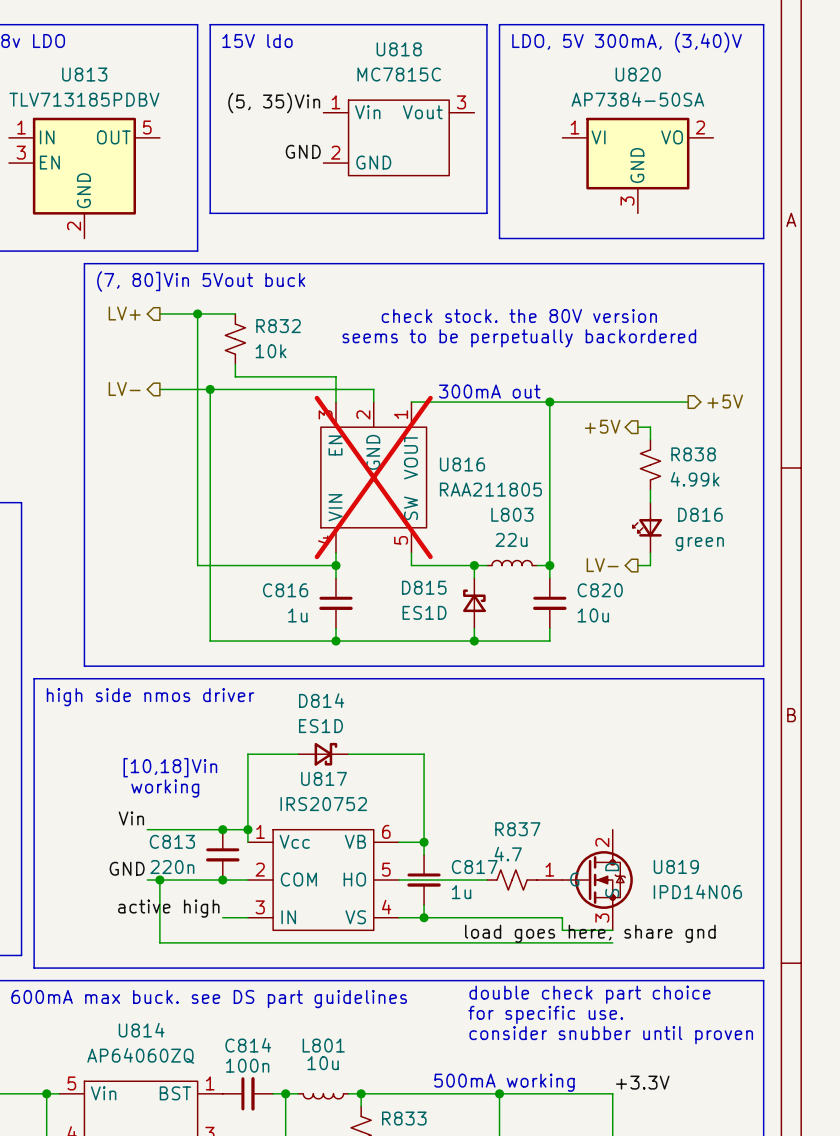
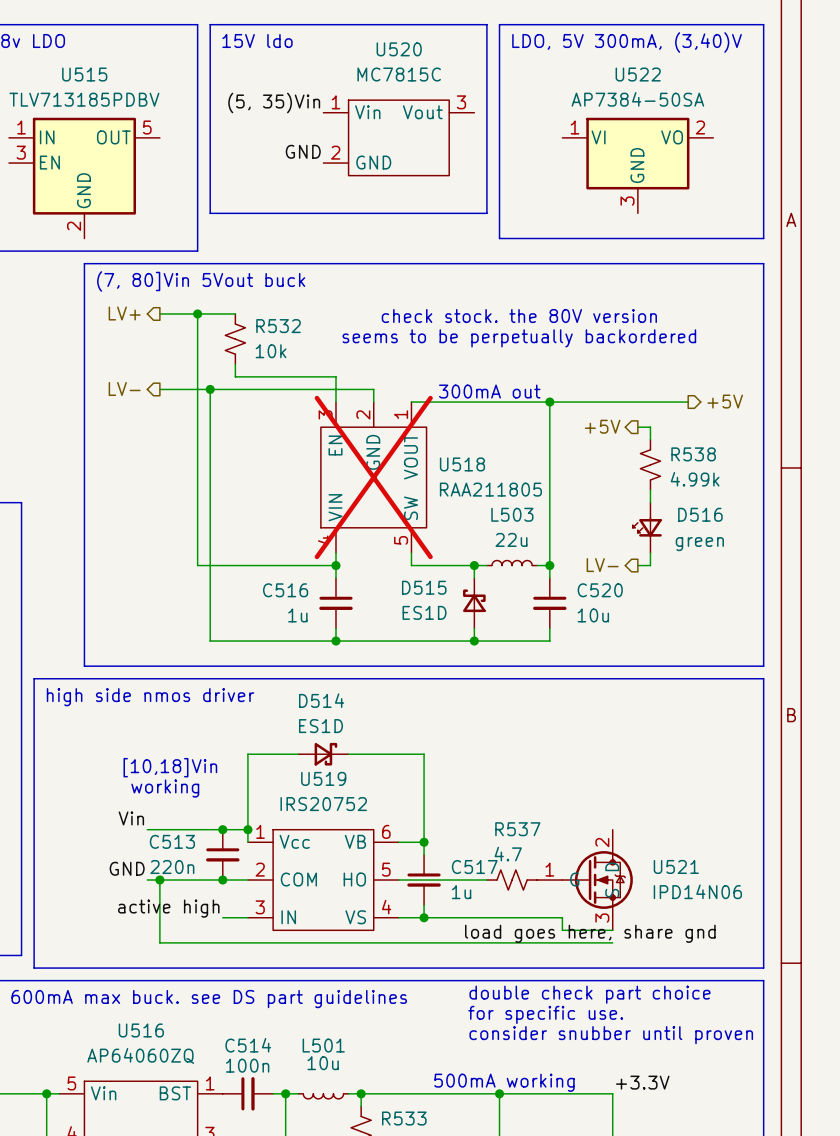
U818 name: U818 (399, 49) -> U520 (399, 49)
U813 name: U813 (84, 74) -> U515 (84, 74)
U820 name: U820 (638, 74) -> U522 (638, 74)
R832 name: R832 (278, 326) -> R532 (278, 326)
R838 name: R838 (693, 454) -> R538 (693, 454)
U816 name: U816 (462, 464) -> U518 (462, 464)
L803 name: L803 (512, 514) -> L503 (512, 514)
D816 name: D816 (700, 514) -> D516 (700, 514)
D815 name: D815 (424, 587) -> D515 (424, 587)
C816 name: C816 (285, 590) -> C516 (285, 590)
C820 name: C820 (600, 590) -> C520 (600, 590)
D814 name: D814 (321, 700) -> D514 (321, 700)
U817 name: U817 (324, 778) -> U519 (323, 778)
R837 name: R837 (517, 829) -> R537 (517, 829)
C813 name: C813 (172, 841) -> C513 (172, 841)
U819 name: U819 (676, 866) -> U521 (676, 866)
C817 name: C817 (474, 867) -> C517 (474, 867)
U814 name: U814 (141, 1030) -> U516 (141, 1030)
C814 name: C814 (248, 1045) -> C514 (248, 1045)
L801 name: L801 (323, 1045) -> L501 (323, 1045)
R833 name: R833 (404, 1118) -> R533 (404, 1118)

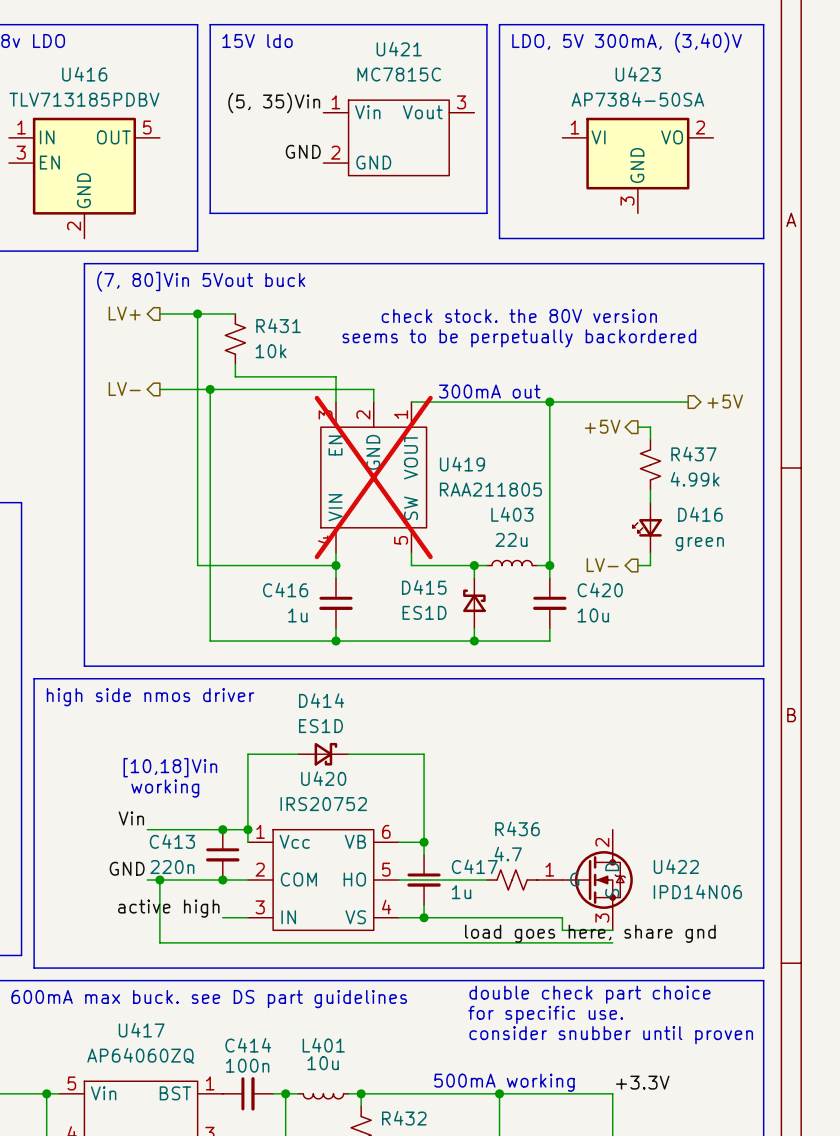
U520 name: U520 (399, 49) -> U421 (399, 49)
U515 name: U515 (84, 74) -> U416 (84, 74)
U522 name: U522 (638, 74) -> U423 (638, 74)
R532 name: R532 (278, 326) -> R431 (278, 325)
R538 name: R538 (693, 454) -> R437 (693, 454)
U518 name: U518 (462, 464) -> U419 (462, 464)
L503 name: L503 (512, 514) -> L403 (512, 514)
D516 name: D516 (700, 514) -> D416 (700, 514)
D515 name: D515 (424, 587) -> D415 (424, 587)
C516 name: C516 (285, 590) -> C416 (285, 589)
C520 name: C520 (600, 590) -> C420 (600, 589)
D514 name: D514 (321, 700) -> D414 (321, 700)
U519 name: U519 (323, 778) -> U420 (323, 778)
R537 name: R537 (517, 829) -> R436 (517, 828)
C513 name: C513 (172, 841) -> C413 (172, 841)
U521 name: U521 (676, 866) -> U422 (676, 866)
C517 name: C517 (474, 867) -> C417 (474, 866)
U516 name: U516 (141, 1030) -> U417 (141, 1030)
C514 name: C514 (248, 1045) -> C414 (248, 1045)
L501 name: L501 (323, 1045) -> L401 (323, 1045)
R533 name: R533 (404, 1118) -> R432 (404, 1118)

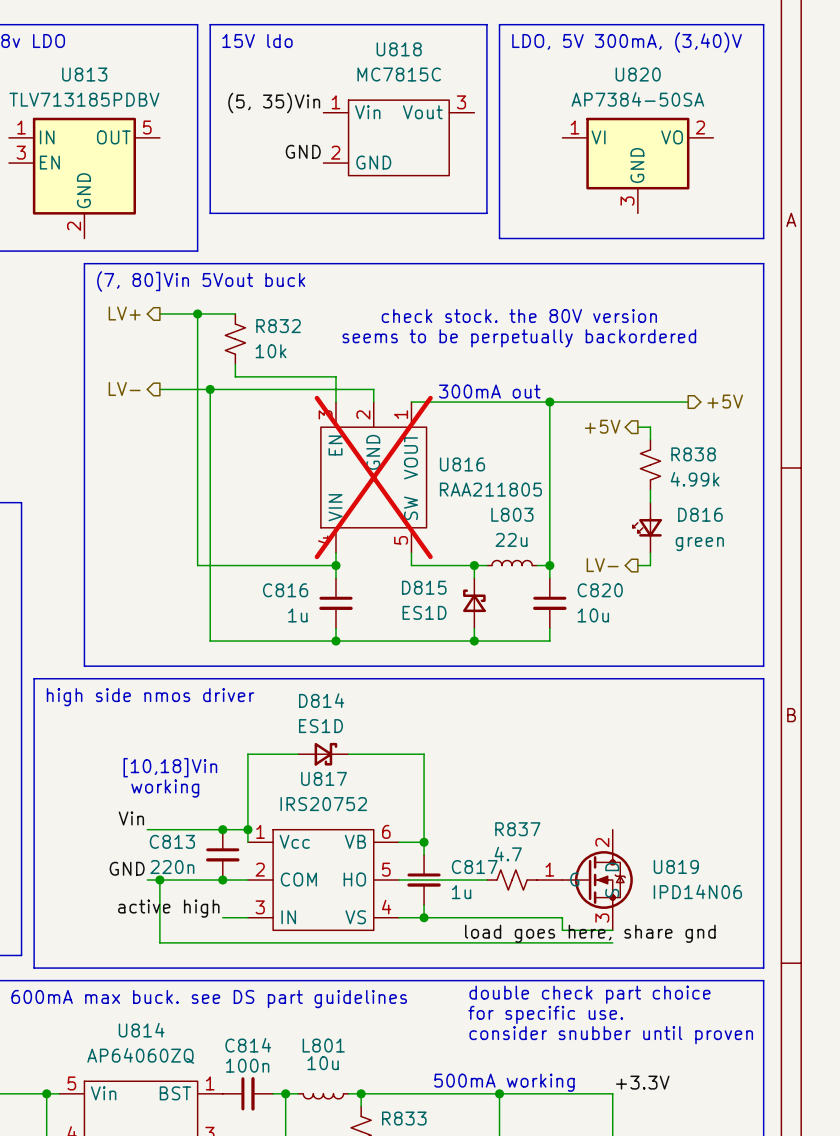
U421 name: U421 (399, 49) -> U818 (399, 49)
U416 name: U416 (84, 74) -> U813 (84, 74)
U423 name: U423 (638, 74) -> U820 (638, 74)
R431 name: R431 (278, 325) -> R832 (278, 326)
R437 name: R437 (693, 454) -> R838 (693, 454)
U419 name: U419 (462, 464) -> U816 (462, 464)
L403 name: L403 (512, 514) -> L803 (512, 514)
D416 name: D416 (700, 514) -> D816 (700, 514)
D415 name: D415 (424, 587) -> D815 (424, 587)
C416 name: C416 (285, 589) -> C816 (285, 590)
C420 name: C420 (600, 589) -> C820 (600, 590)
D414 name: D414 (321, 700) -> D814 (321, 700)
U420 name: U420 (323, 778) -> U817 (324, 778)
R436 name: R436 (517, 828) -> R837 (517, 829)
C413 name: C413 (172, 841) -> C813 (172, 841)
C417 name: C417 (474, 866) -> C817 (474, 867)
U422 name: U422 (676, 866) -> U819 (676, 866)
U417 name: U417 (141, 1030) -> U814 (141, 1030)
C414 name: C414 (248, 1045) -> C814 (248, 1045)
L401 name: L401 (323, 1045) -> L801 (323, 1045)
R432 name: R432 (404, 1118) -> R833 (404, 1118)

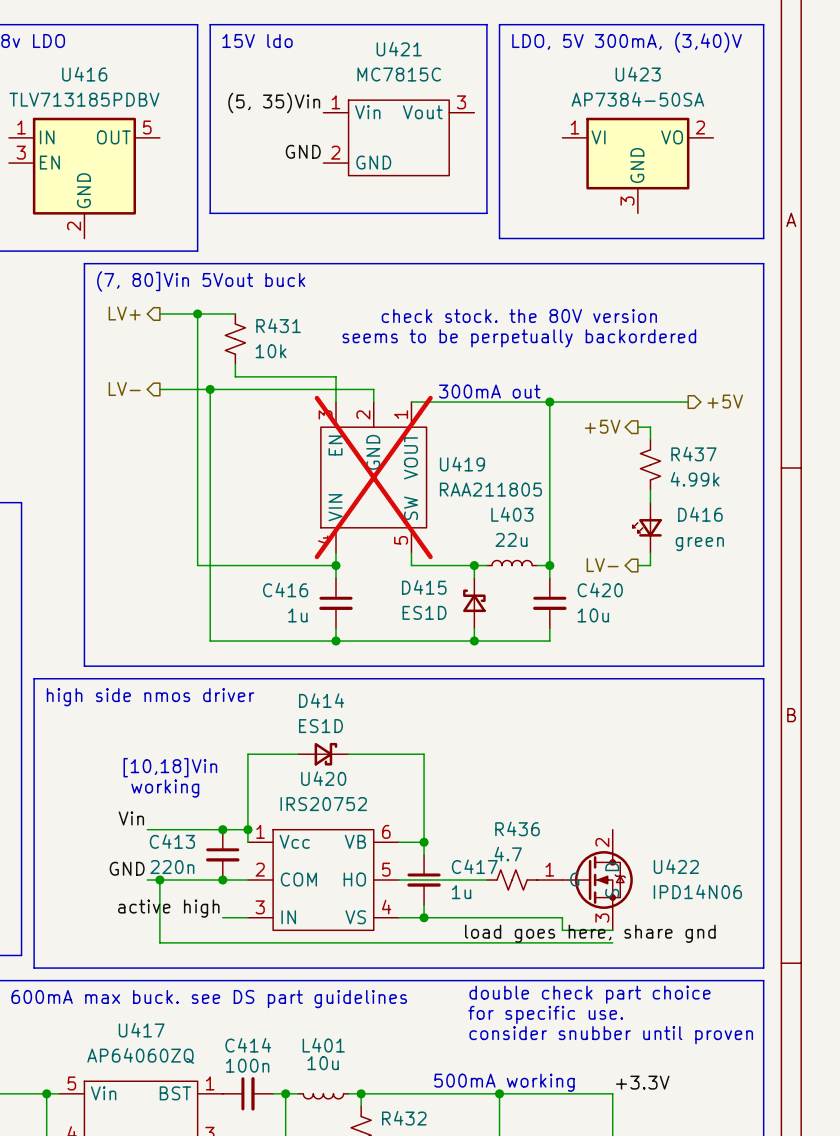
U818 name: U818 (399, 49) -> U421 (399, 49)
U813 name: U813 (84, 74) -> U416 (84, 74)
U820 name: U820 (638, 74) -> U423 (638, 74)
R832 name: R832 (278, 326) -> R431 (278, 325)
R838 name: R838 (693, 454) -> R437 (693, 454)
U816 name: U816 (462, 464) -> U419 (462, 464)
L803 name: L803 (512, 514) -> L403 (512, 514)
D816 name: D816 (700, 514) -> D416 (700, 514)
D815 name: D815 (424, 587) -> D415 (424, 587)
C816 name: C816 (285, 590) -> C416 (285, 589)
C820 name: C820 (600, 590) -> C420 (600, 589)
D814 name: D814 (321, 700) -> D414 (321, 700)
U817 name: U817 (324, 778) -> U420 (323, 778)
R837 name: R837 (517, 829) -> R436 (517, 828)
C813 name: C813 (172, 841) -> C413 (172, 841)
U819 name: U819 (676, 866) -> U422 (676, 866)
C817 name: C817 (474, 867) -> C417 (474, 866)
U814 name: U814 (141, 1030) -> U417 (141, 1030)
C814 name: C814 (248, 1045) -> C414 (248, 1045)
L801 name: L801 (323, 1045) -> L401 (323, 1045)
R833 name: R833 (404, 1118) -> R432 (404, 1118)

